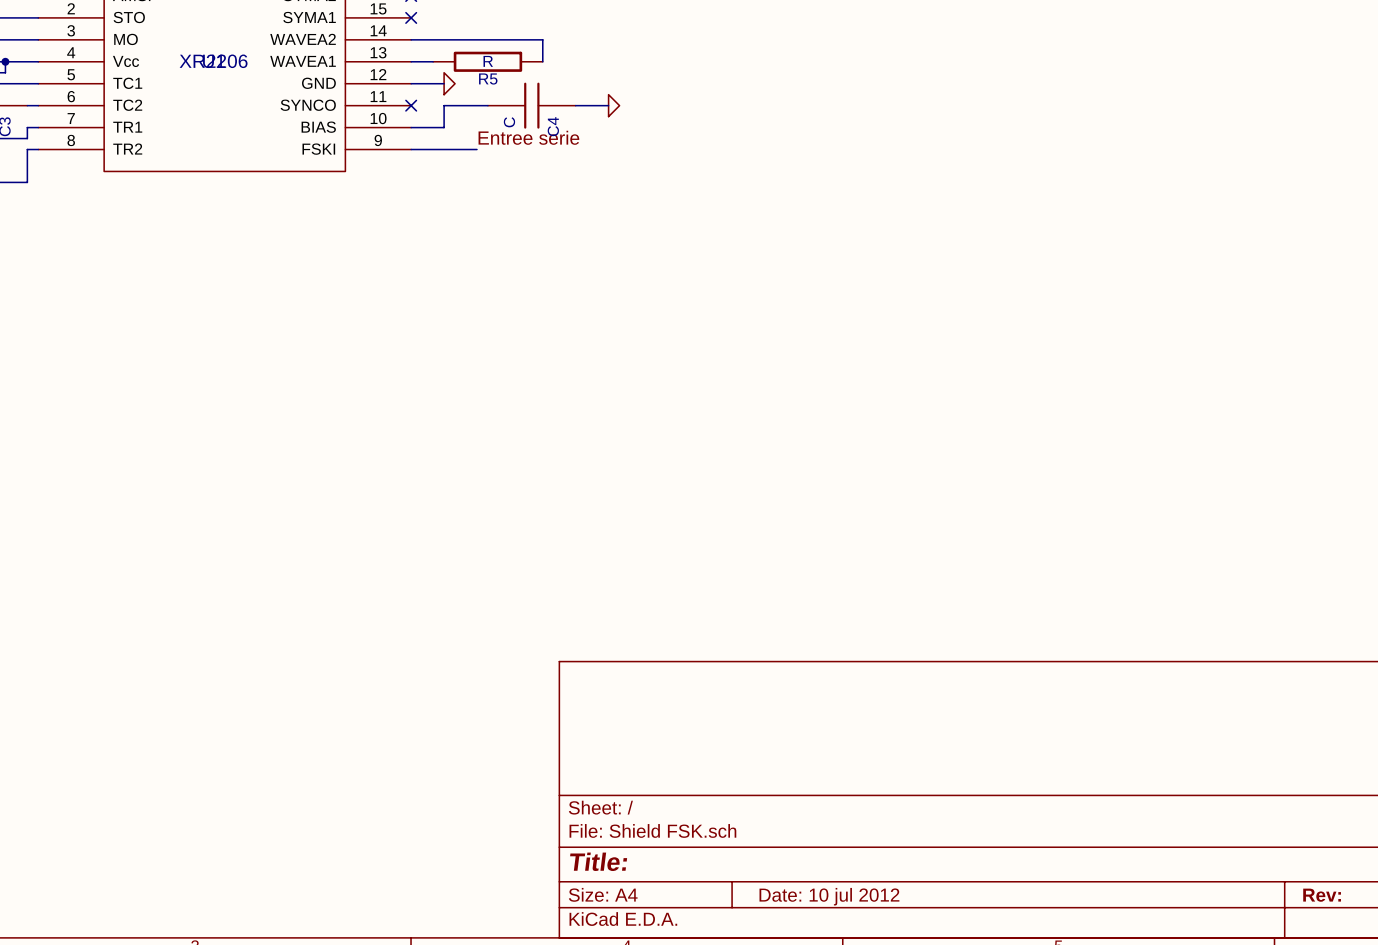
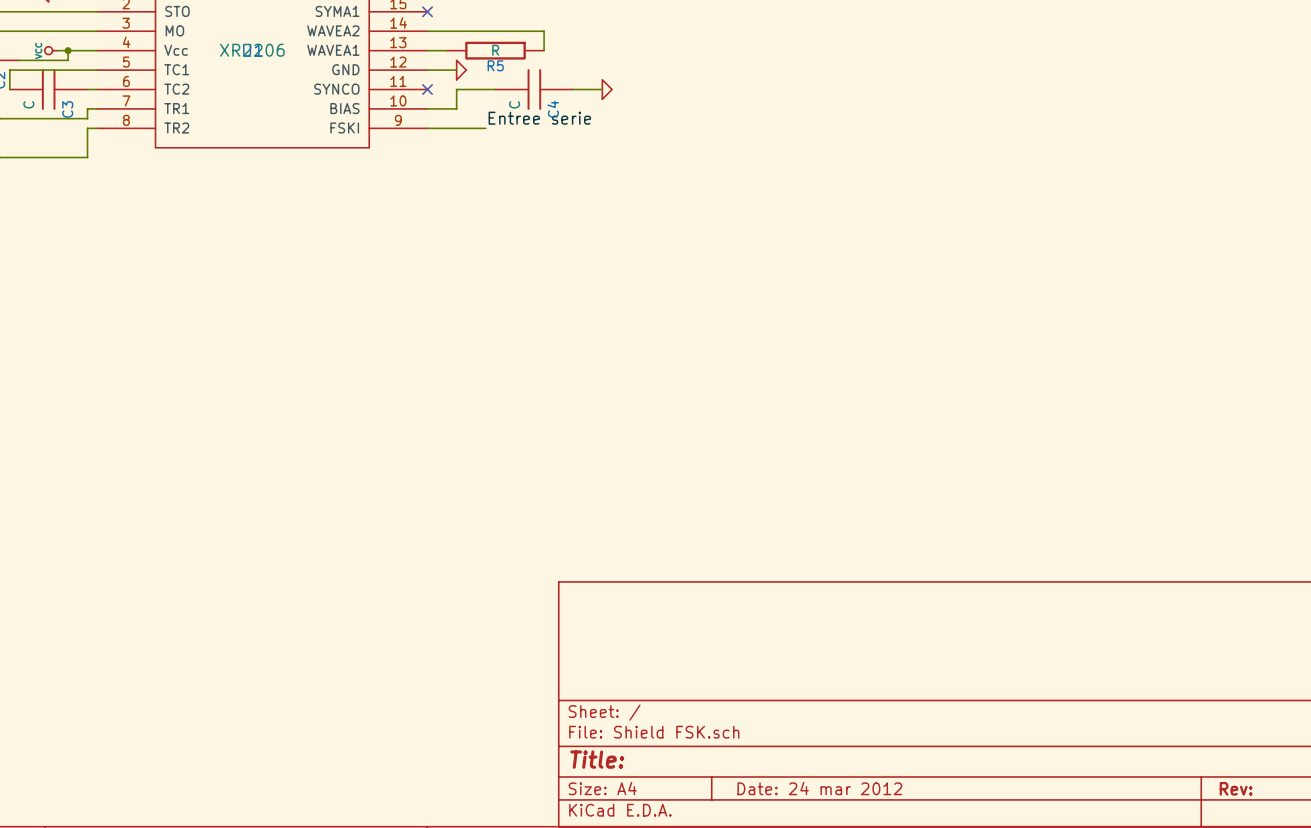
title block: Date: 10 jul 2012 (829, 896) -> Date: 24 mar 2012 (819, 788)

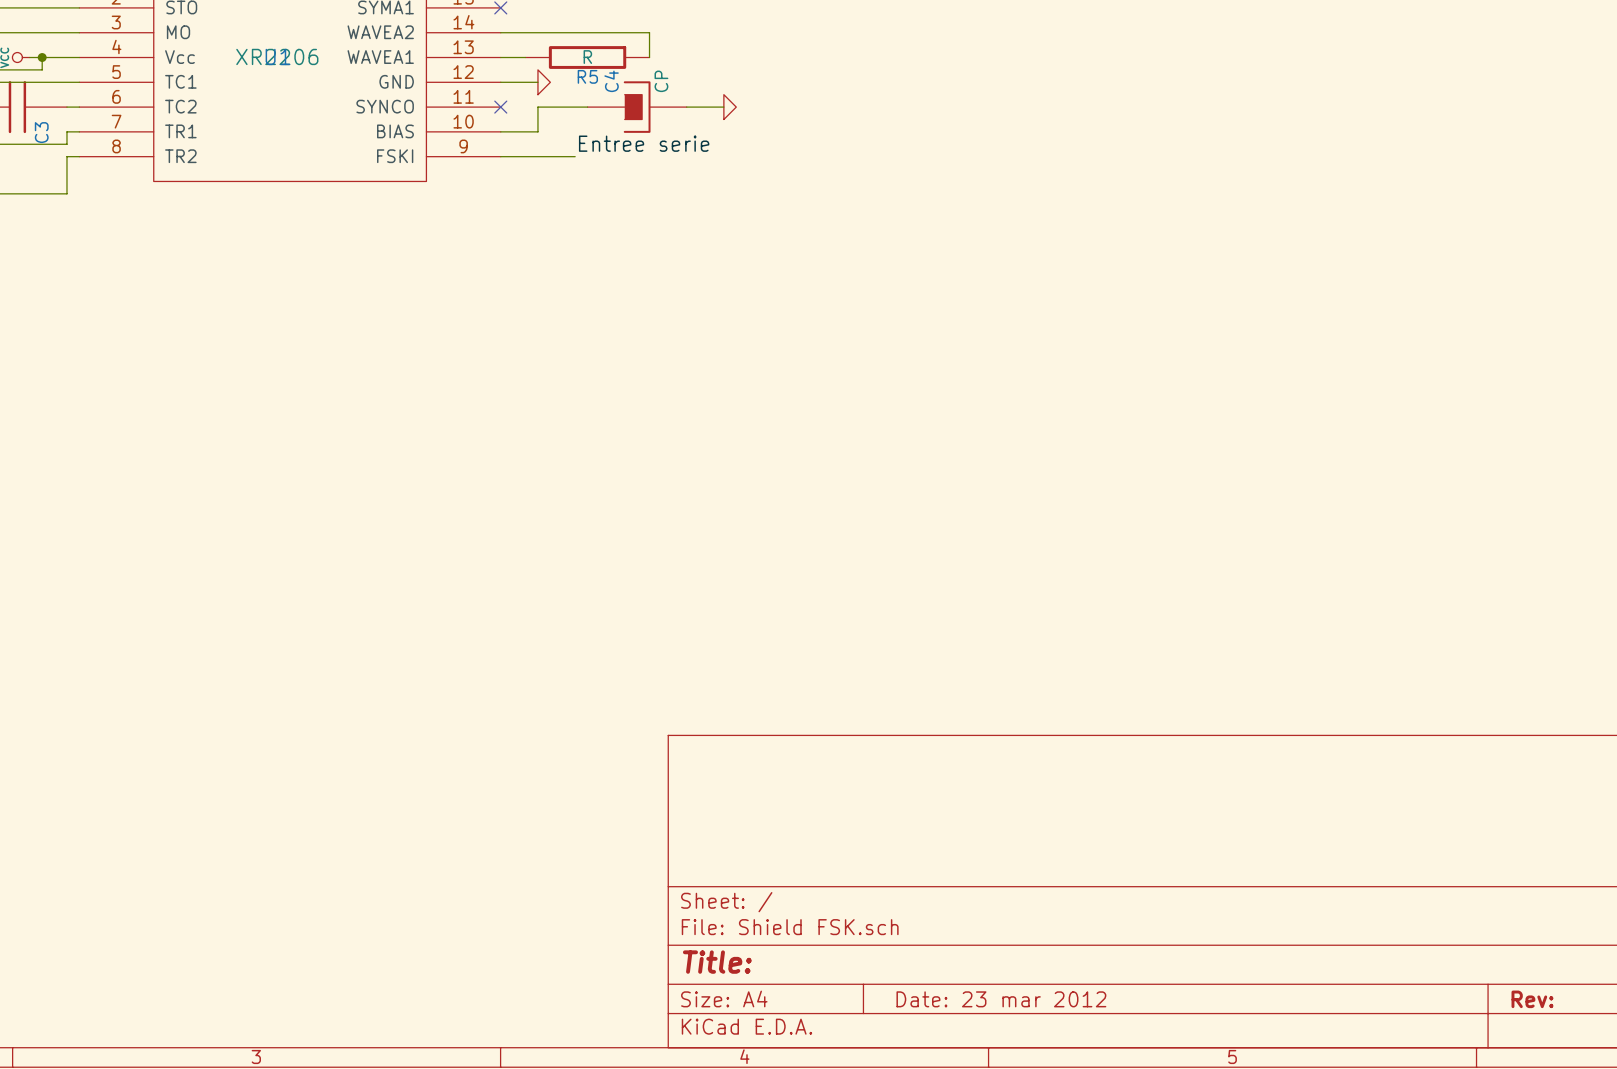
C4 symbol: [495, 69, 574, 110] -> [587, 81, 687, 133]
C4 value: C (514, 104) -> CP (661, 81)
C4 name position: C4 (553, 109) -> C4 (611, 81)
title block: Date: 24 mar 2012 (819, 788) -> Date: 23 mar 2012 (1001, 999)

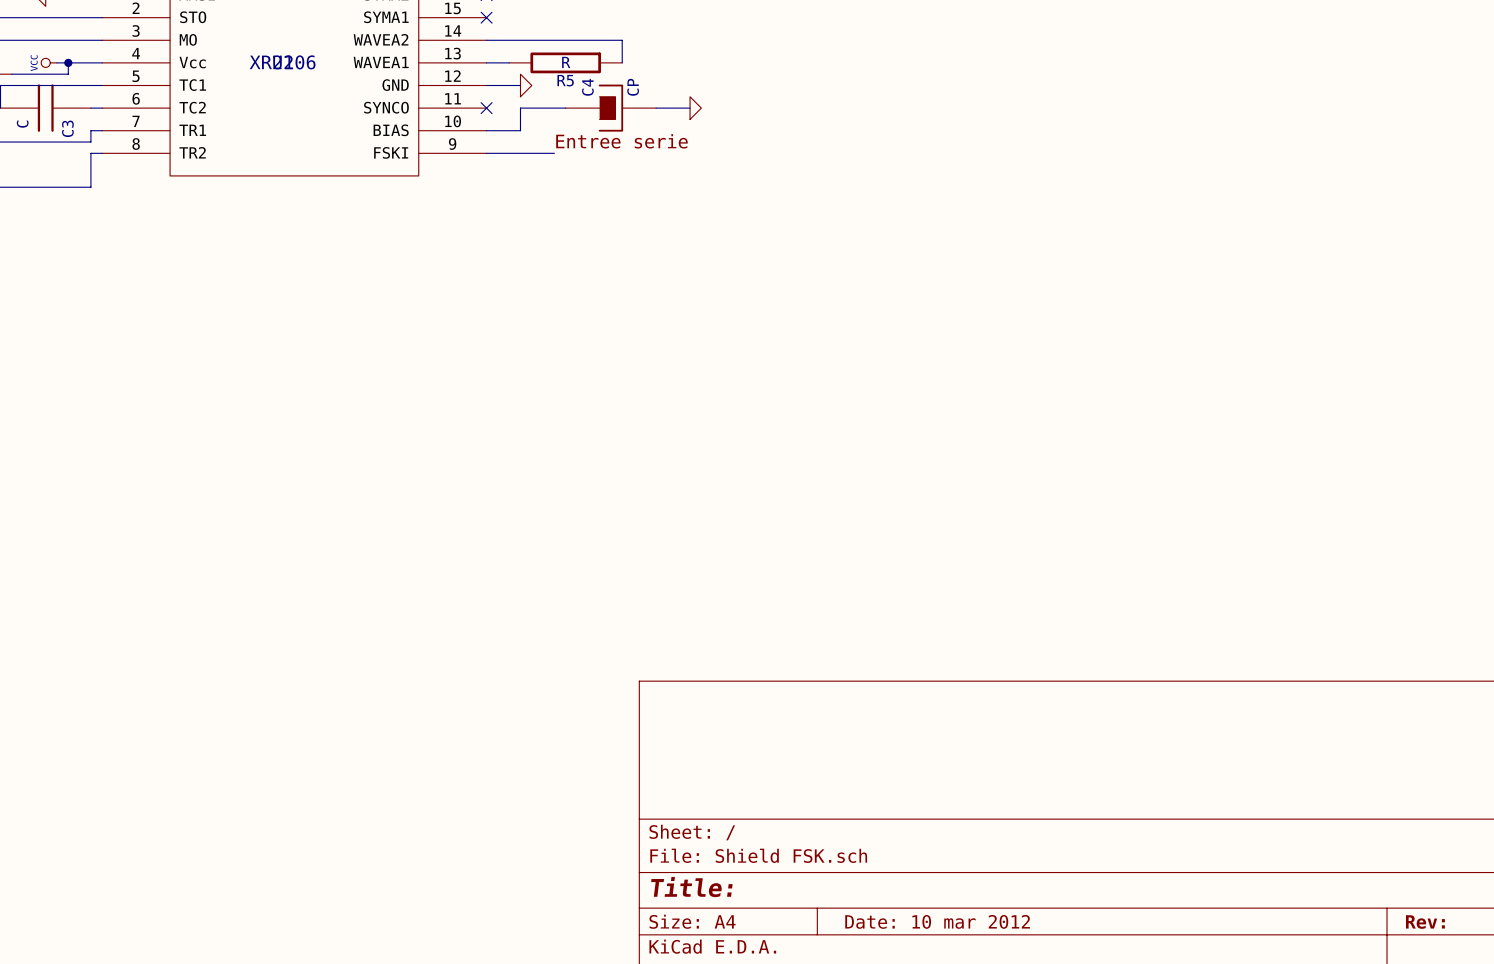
title block: Date: 23 mar 2012 (1001, 999) -> Date: 10 mar 2012 (937, 921)

